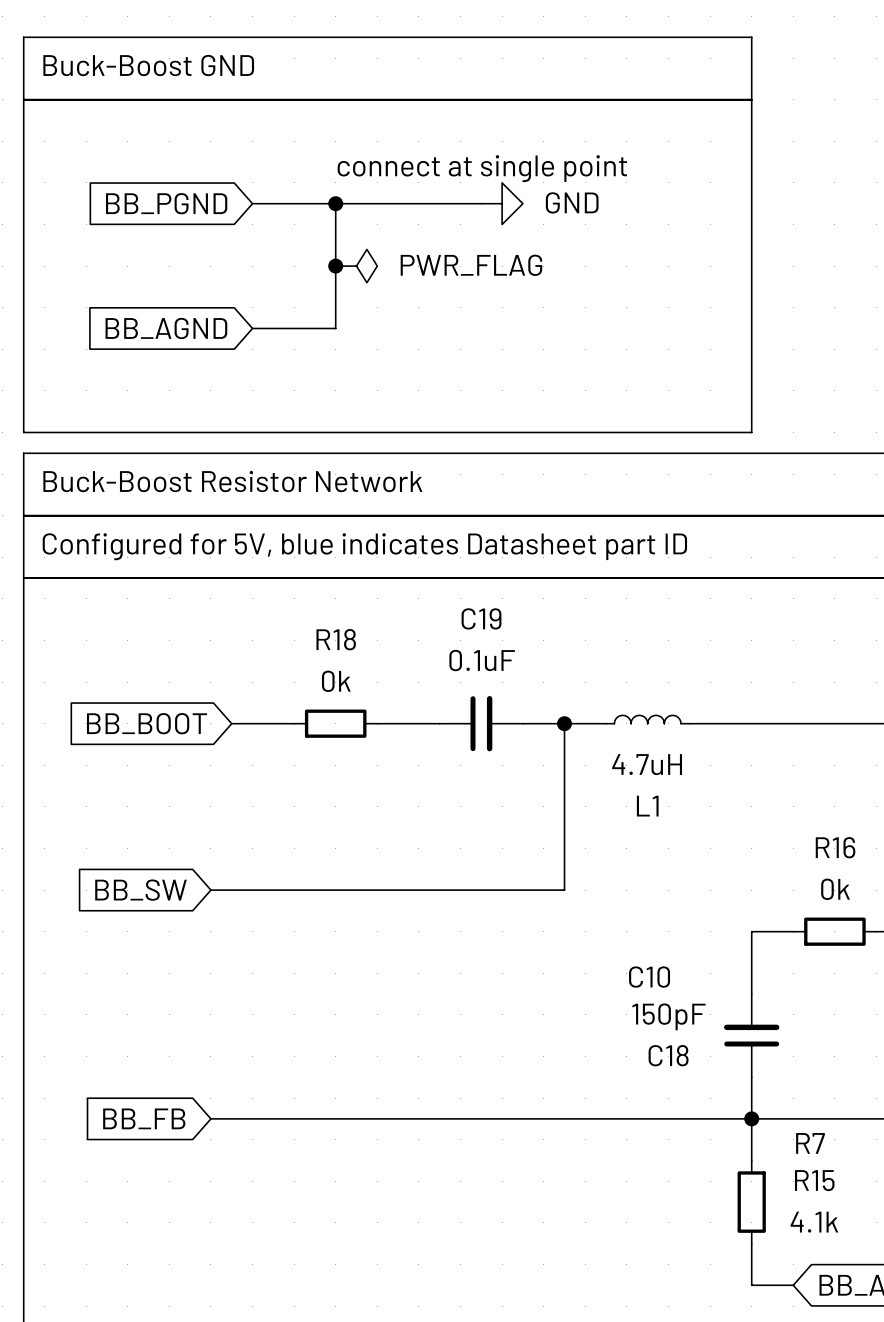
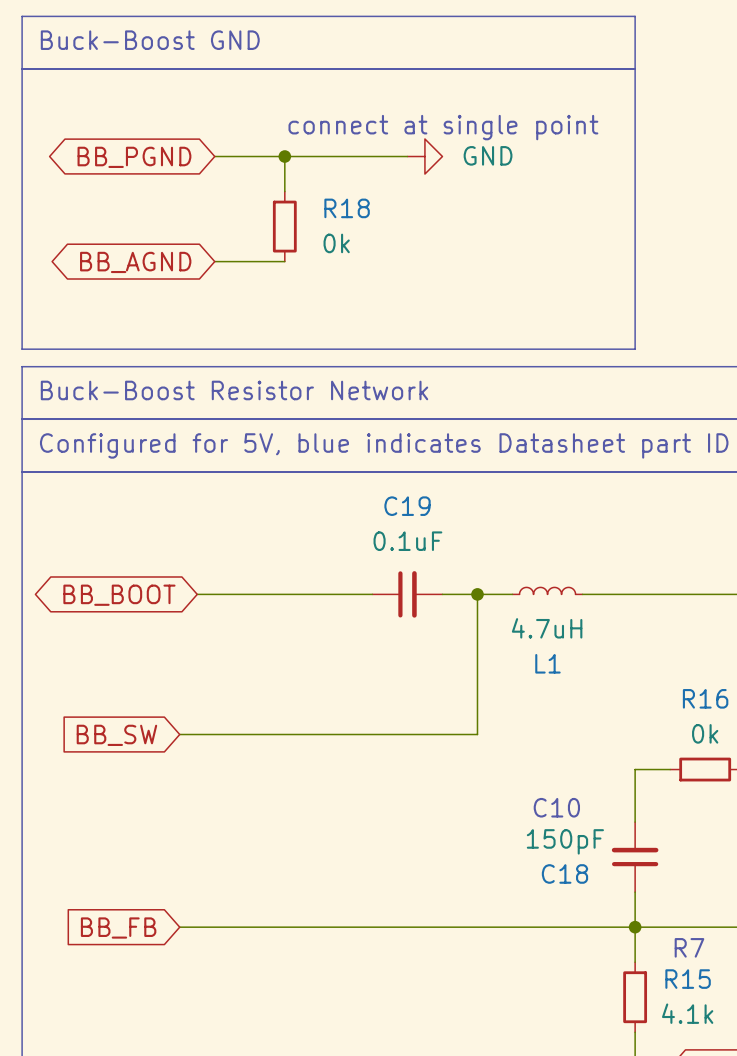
global label shape: input (166, 203) -> bidirectional (134, 157)
wire: (335, 245) (335, 328) -> none
junction: (335, 266) -> none
power symbol: PWR_FLAG (356, 266) -> none
global label shape: input (166, 328) -> bidirectional (135, 262)
global label shape: input (146, 723) -> bidirectional (119, 595)
wire: none -> (249, 594) (319, 594)
R18 rotation: 0° (335, 723) -> 90° clockwise (284, 226)
R18 position: (335, 723) -> (284, 226)

